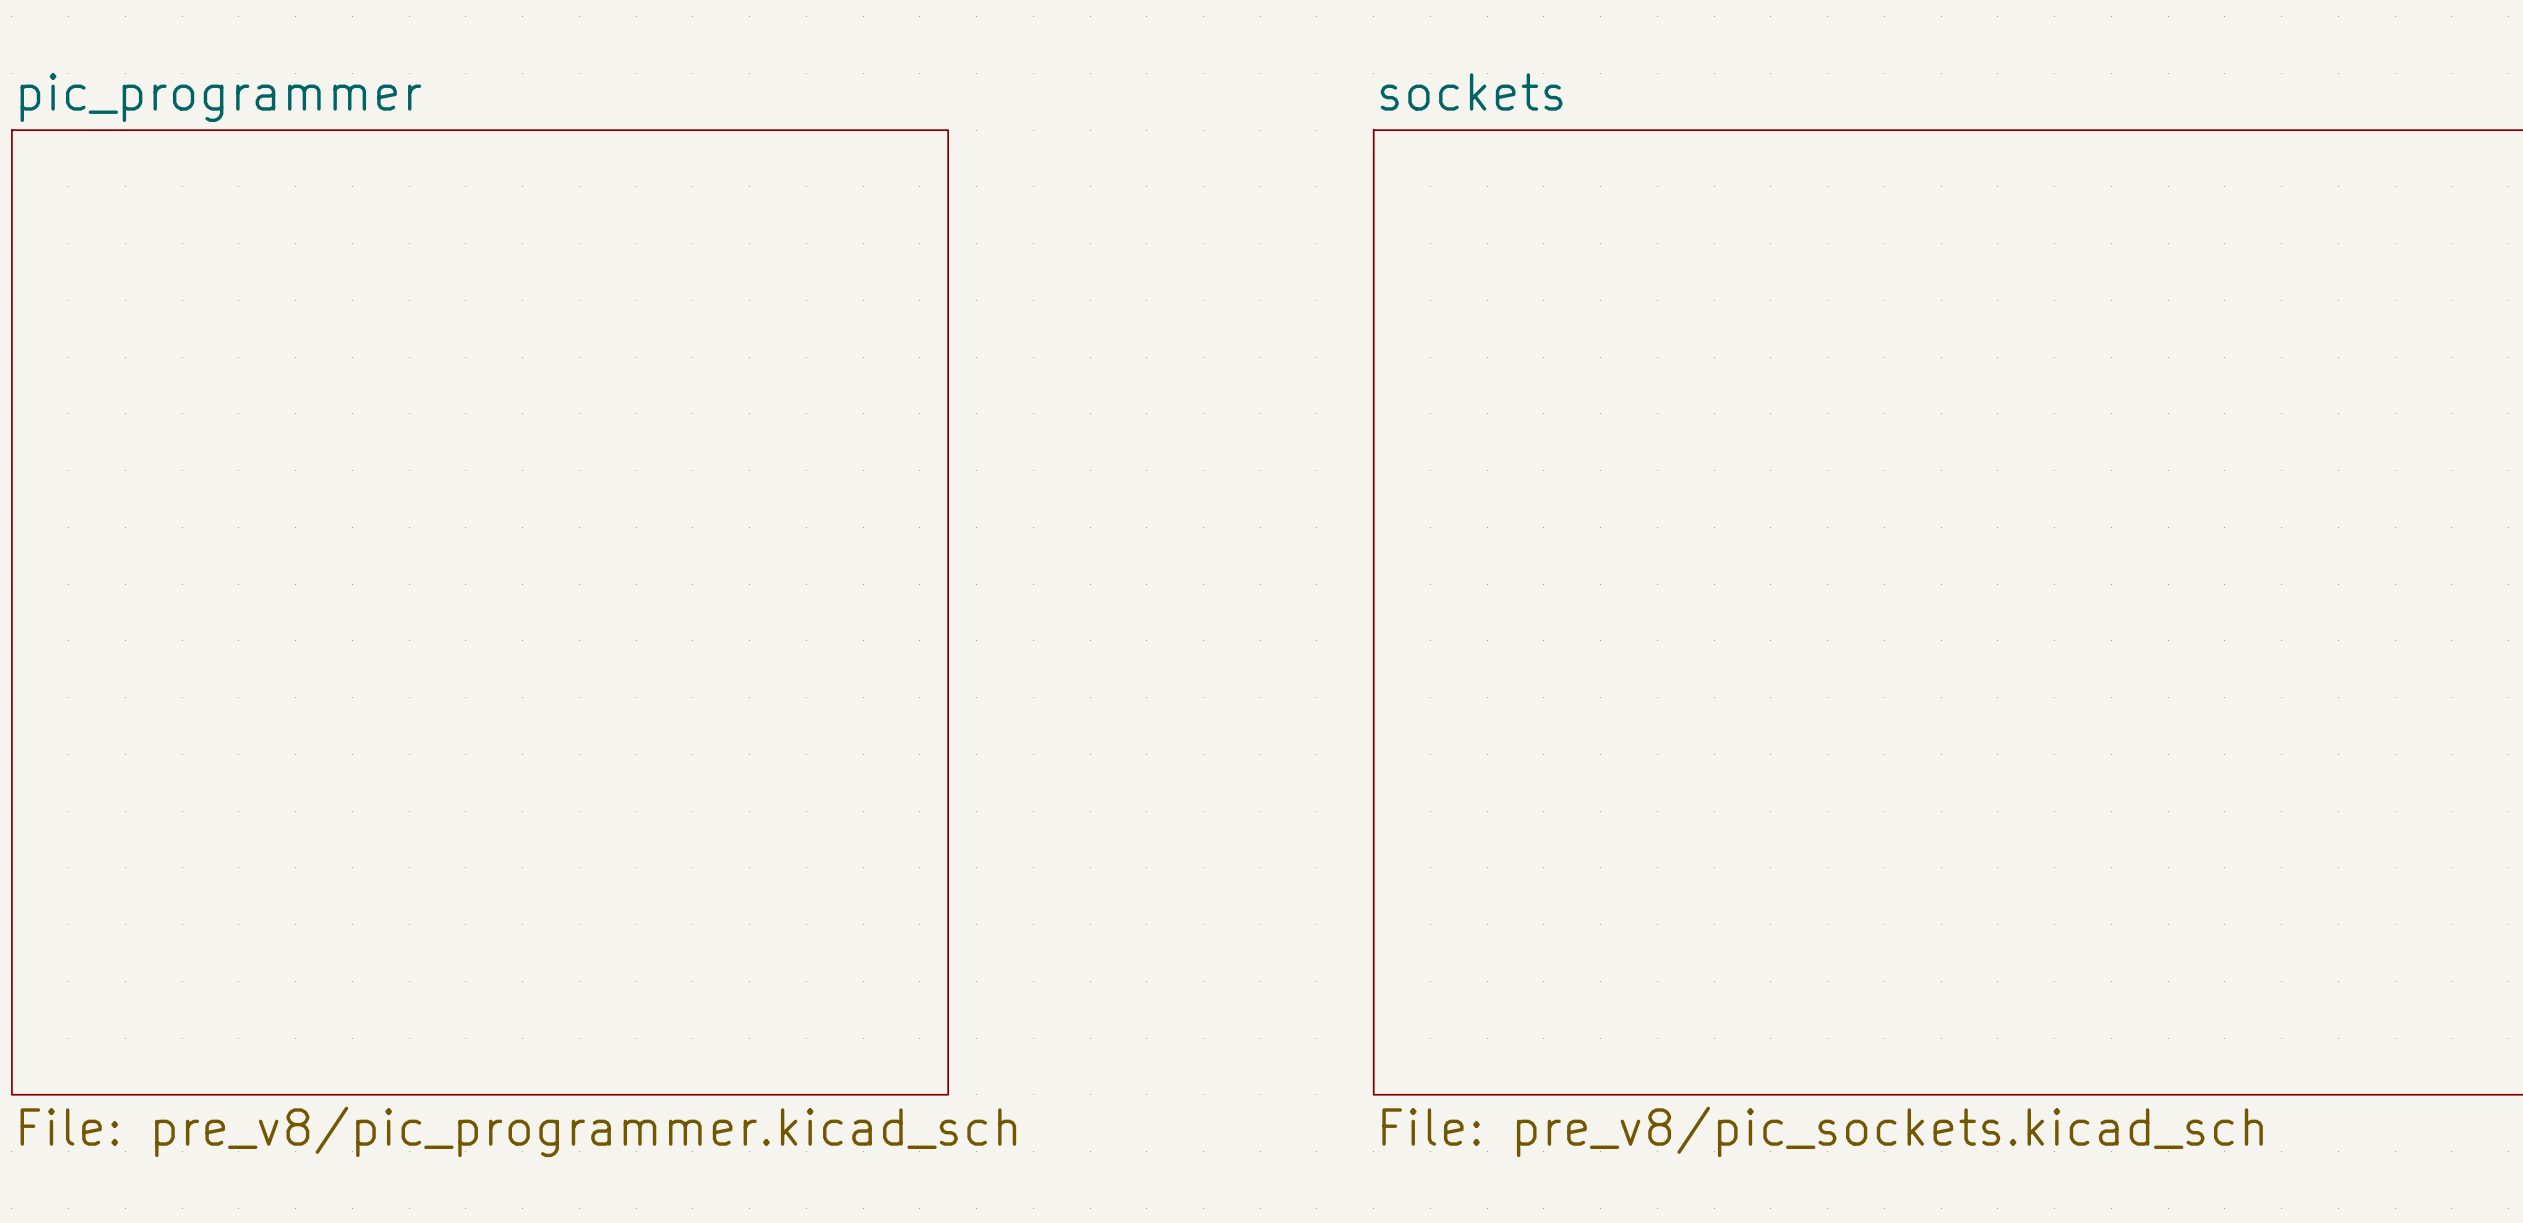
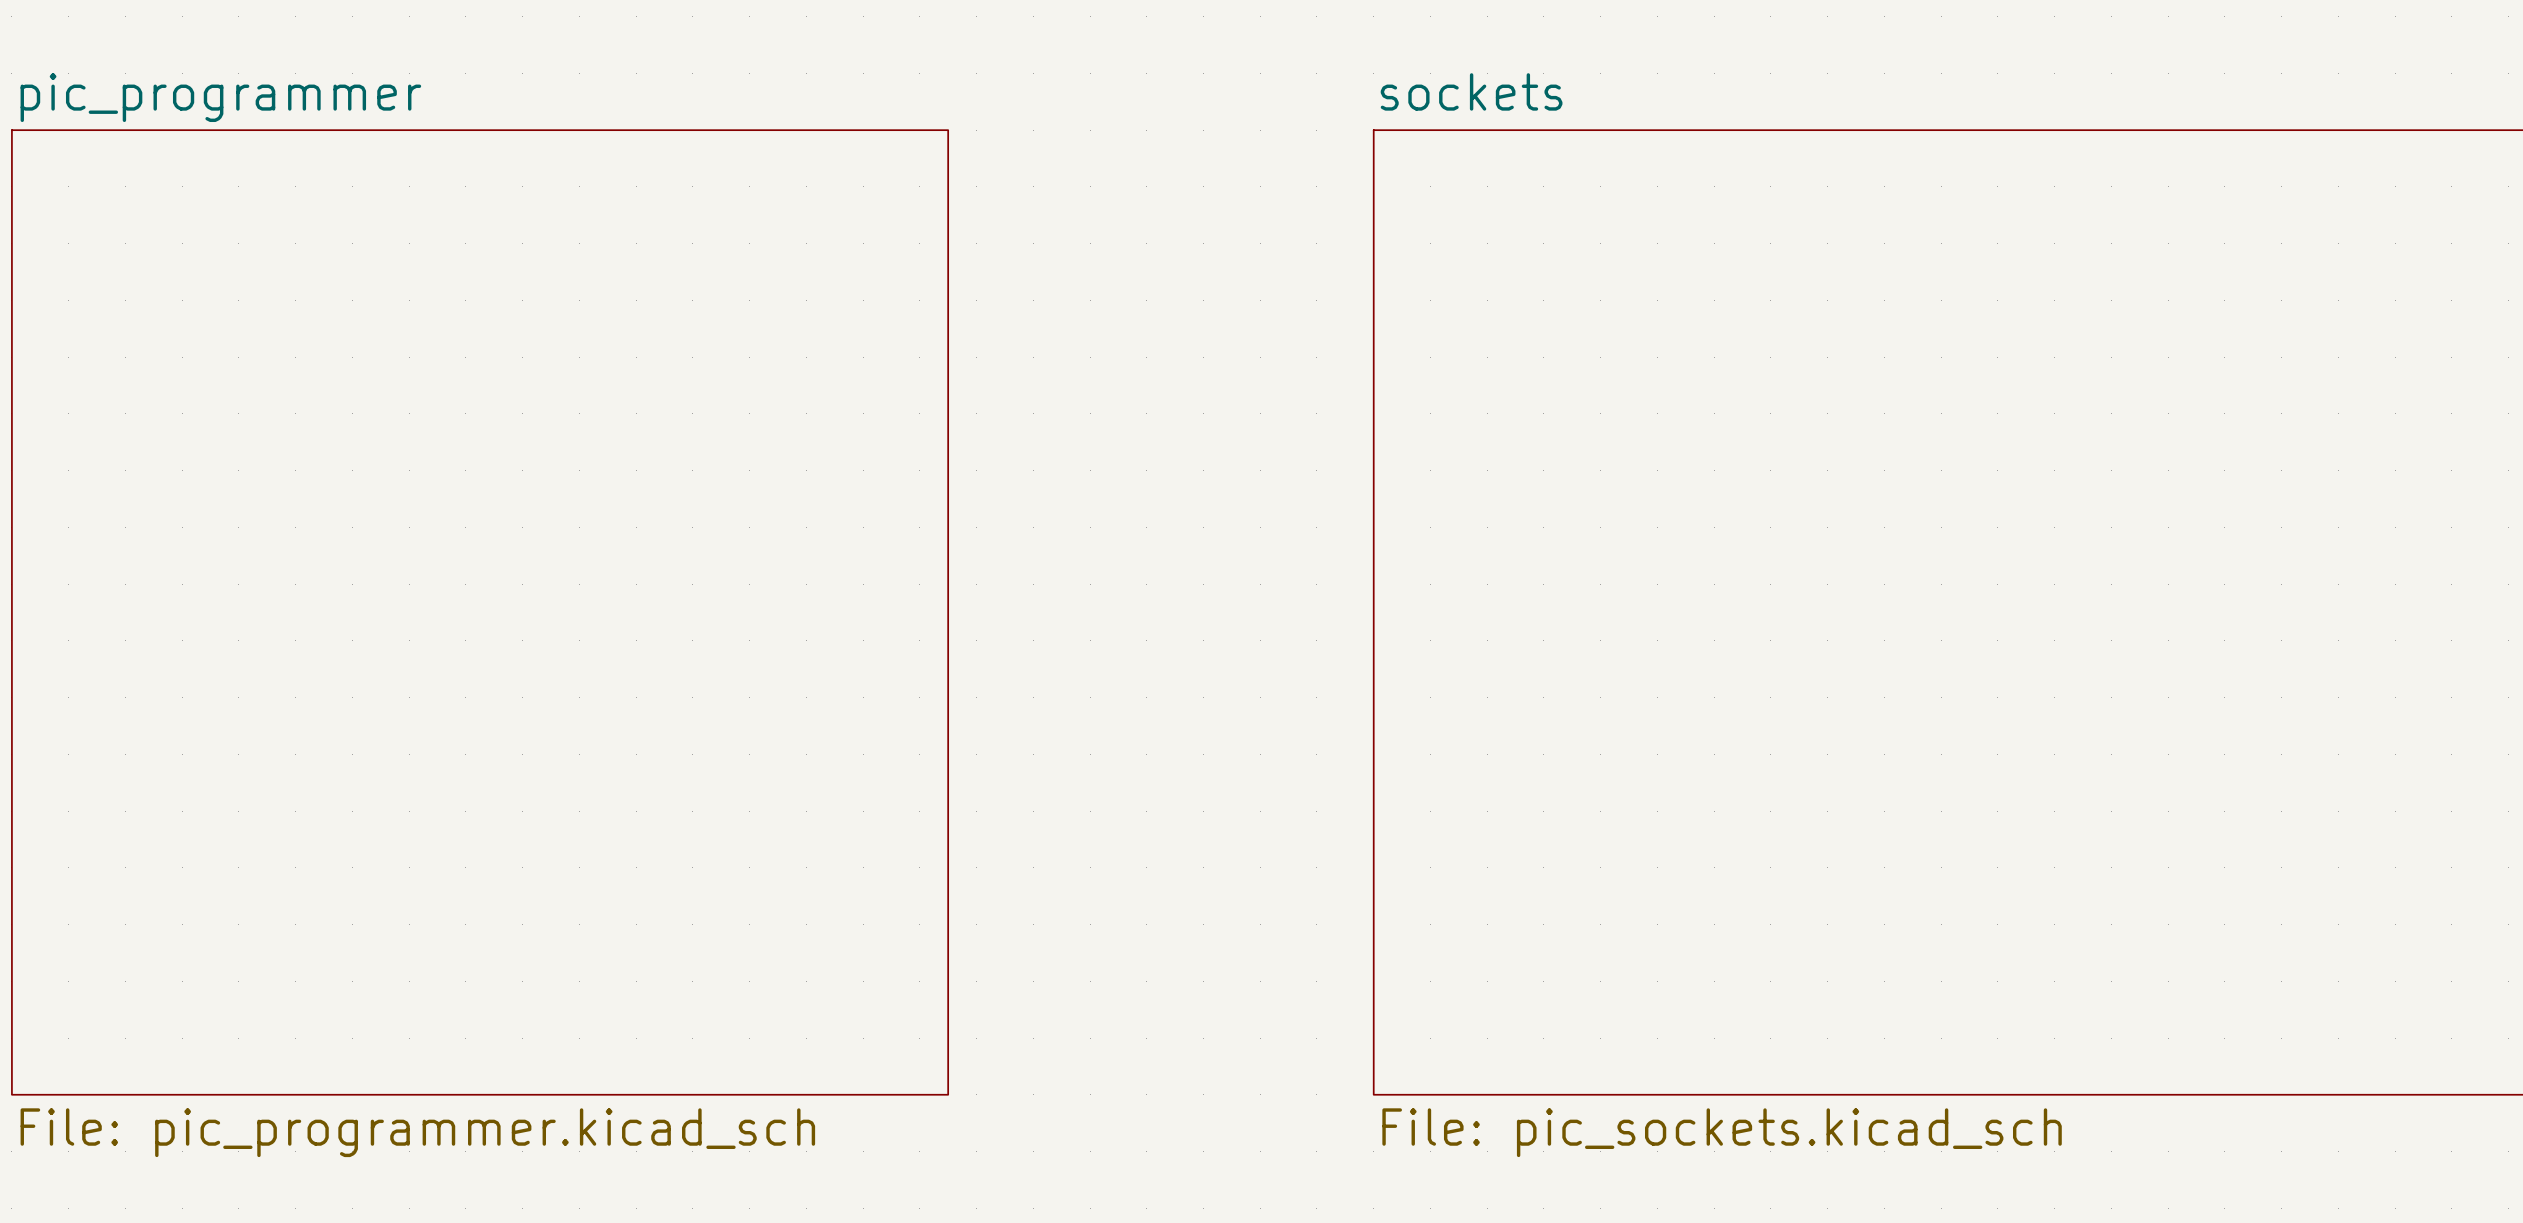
sheet pic_programmer value: File: pre_v8/pic_programmer.kicad_sch (518, 1131) -> File: pic_programmer.kicad_sch (417, 1132)
sheet sockets value: File: pre_v8/pic_sockets.kicad_sch (1822, 1131) -> File: pic_sockets.kicad_sch (1722, 1132)

